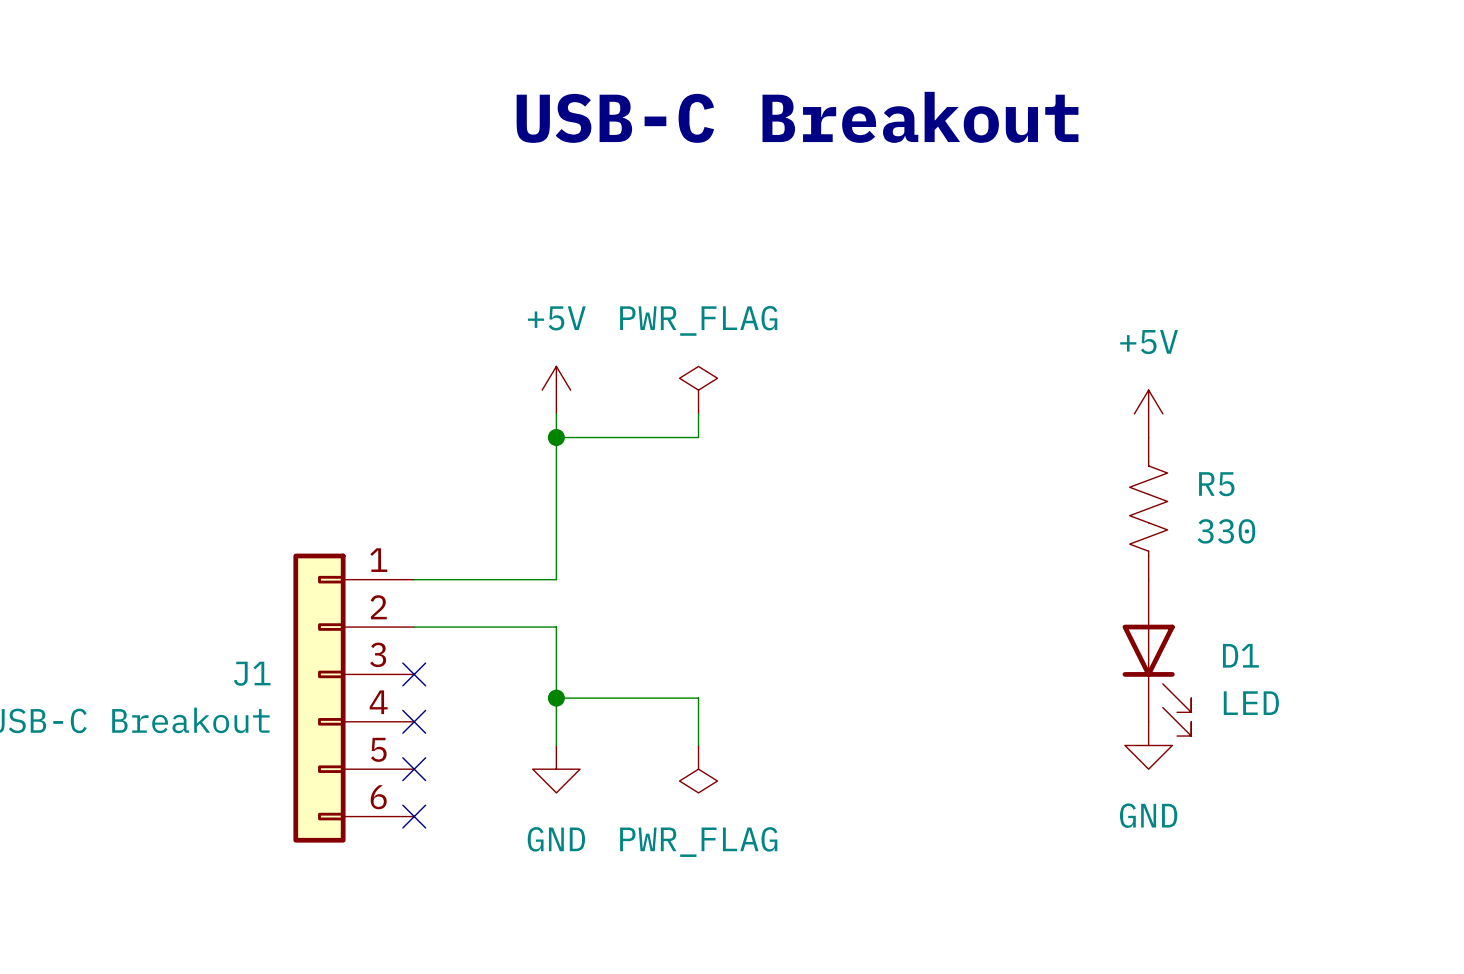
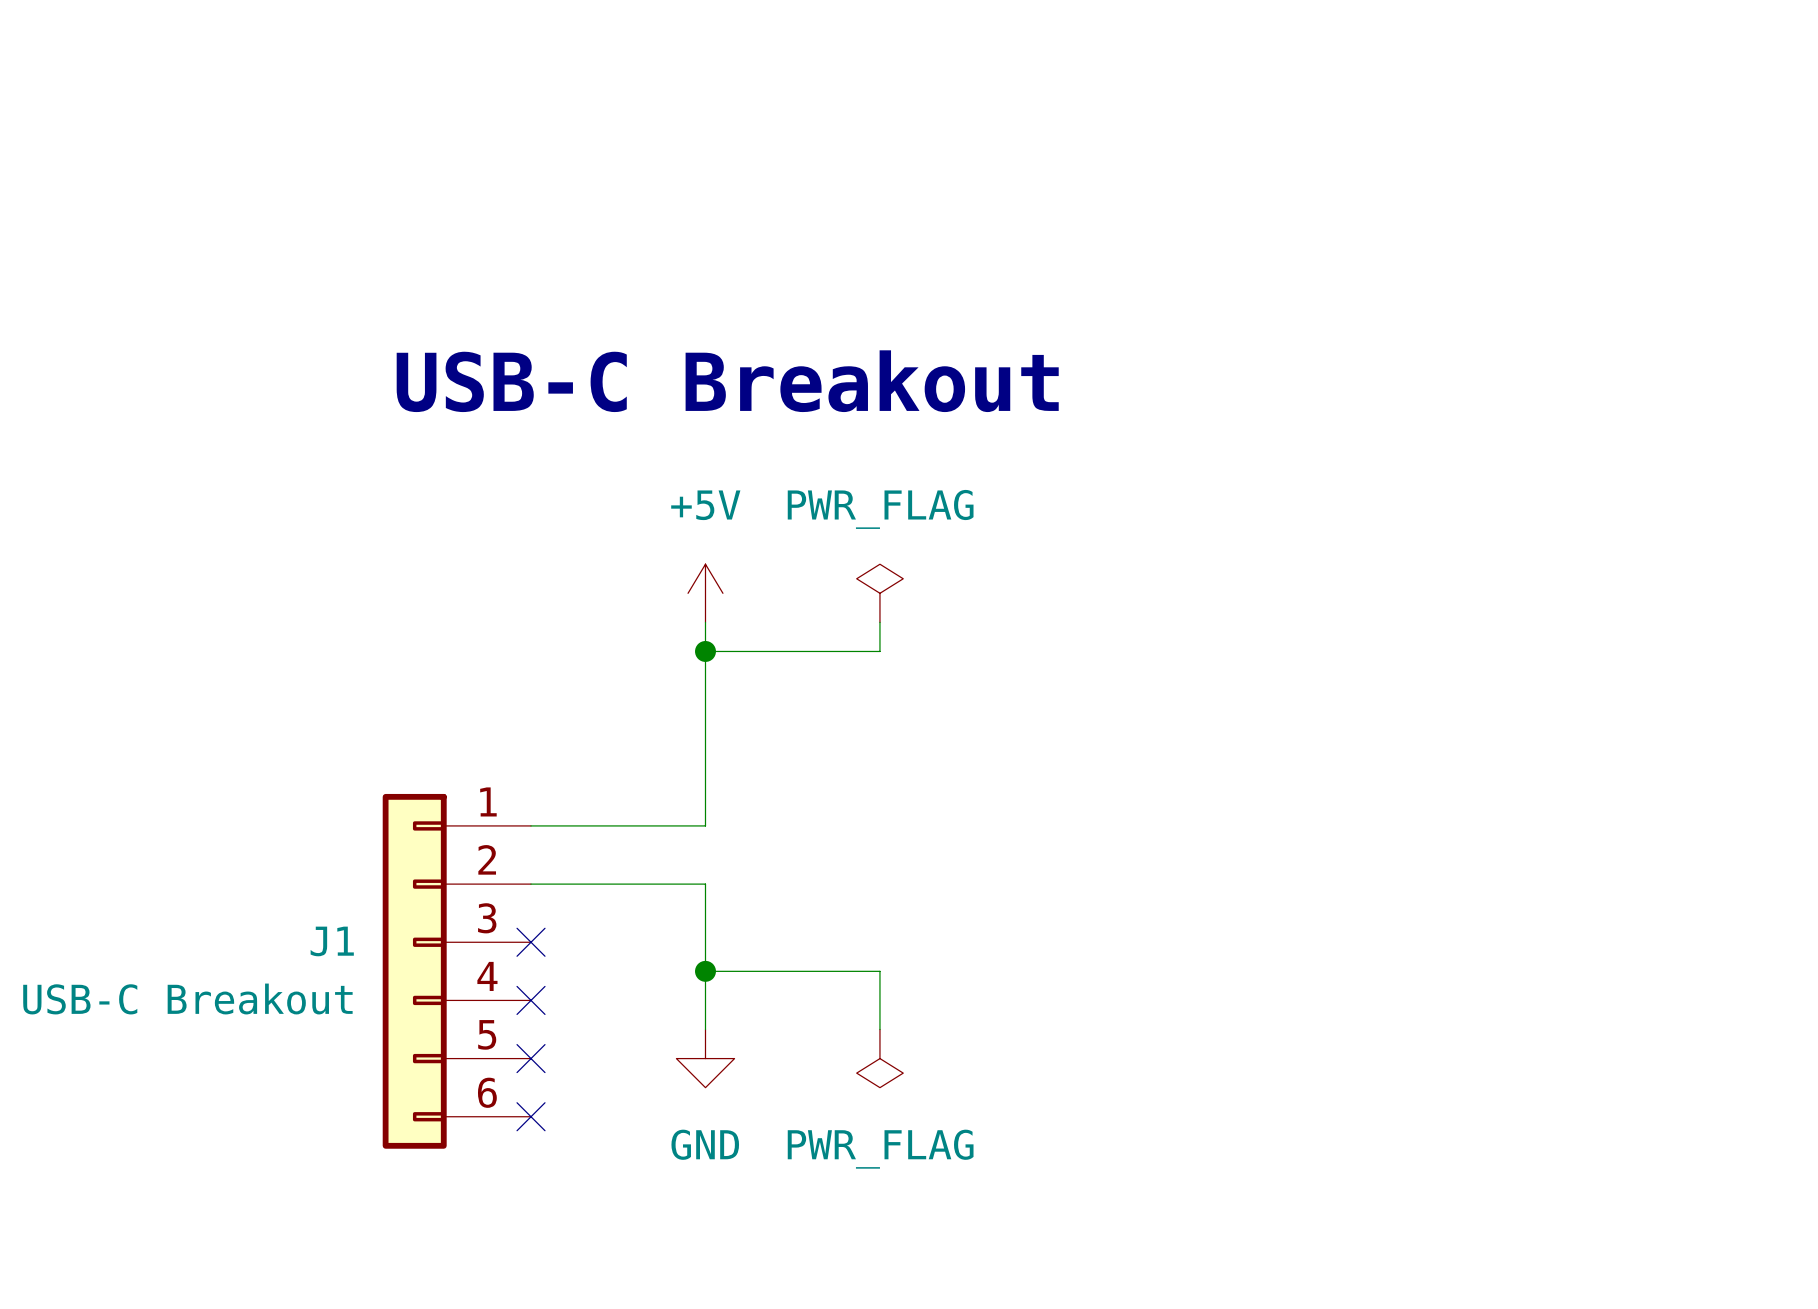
text position: USB-C Breakout (797, 117) -> USB-C Breakout (727, 381)
power symbol: +5V (1148, 413) -> none
R5: 330 (1148, 508) -> none
D1: LED (1156, 657) -> none
power symbol: GND (1148, 745) -> none

